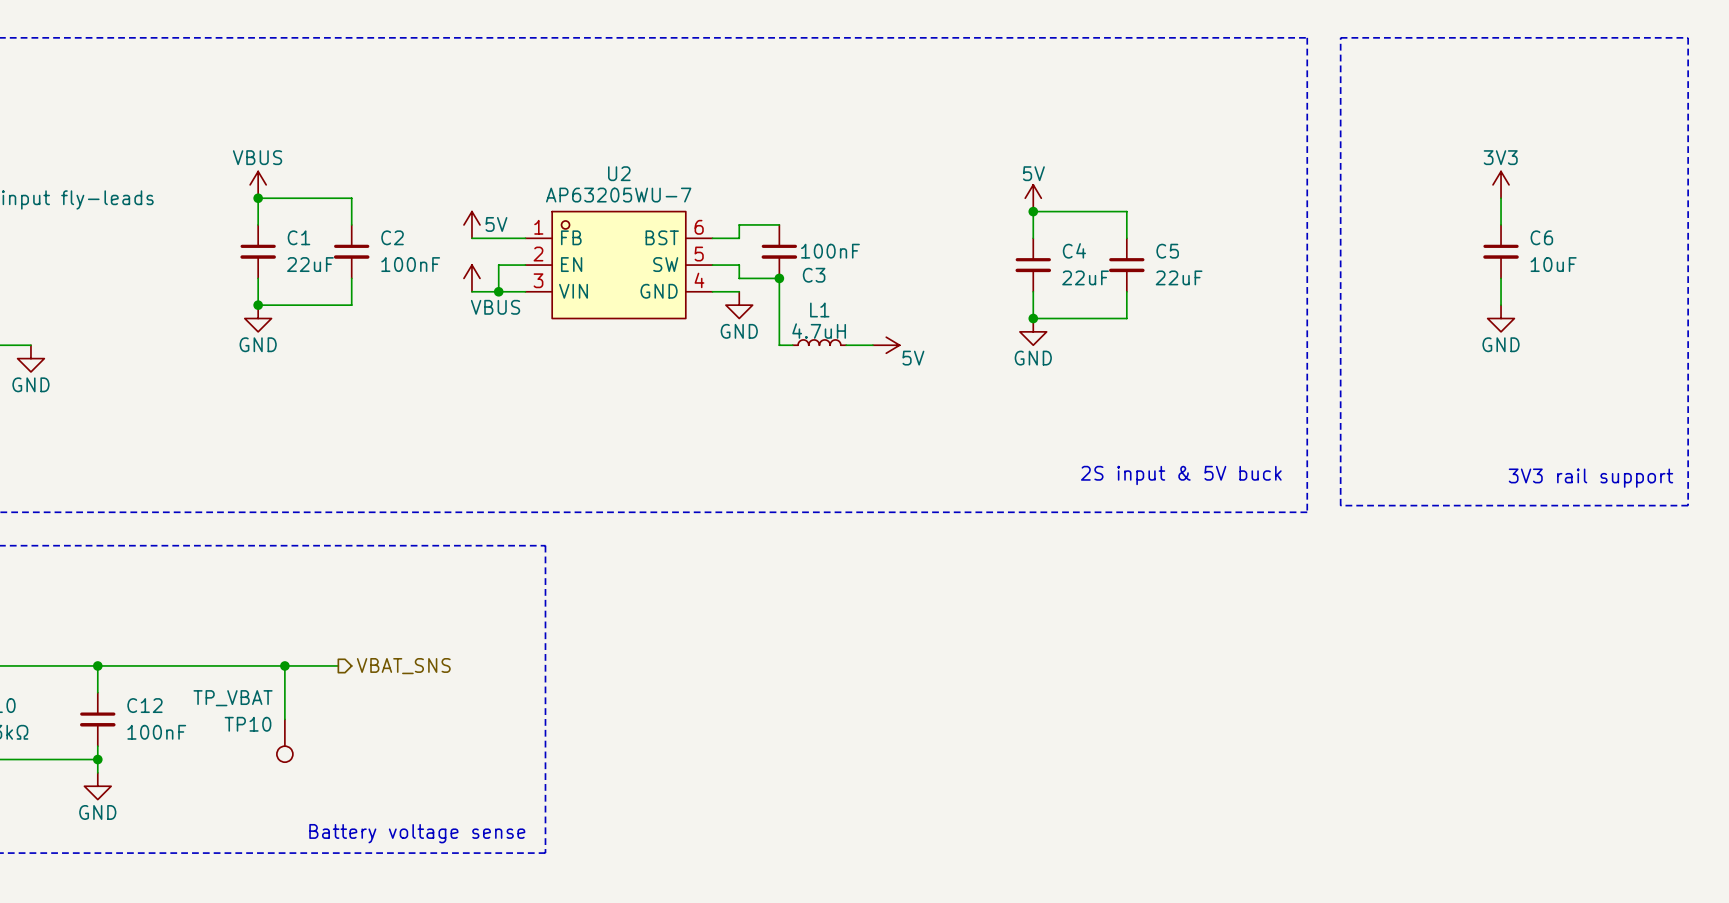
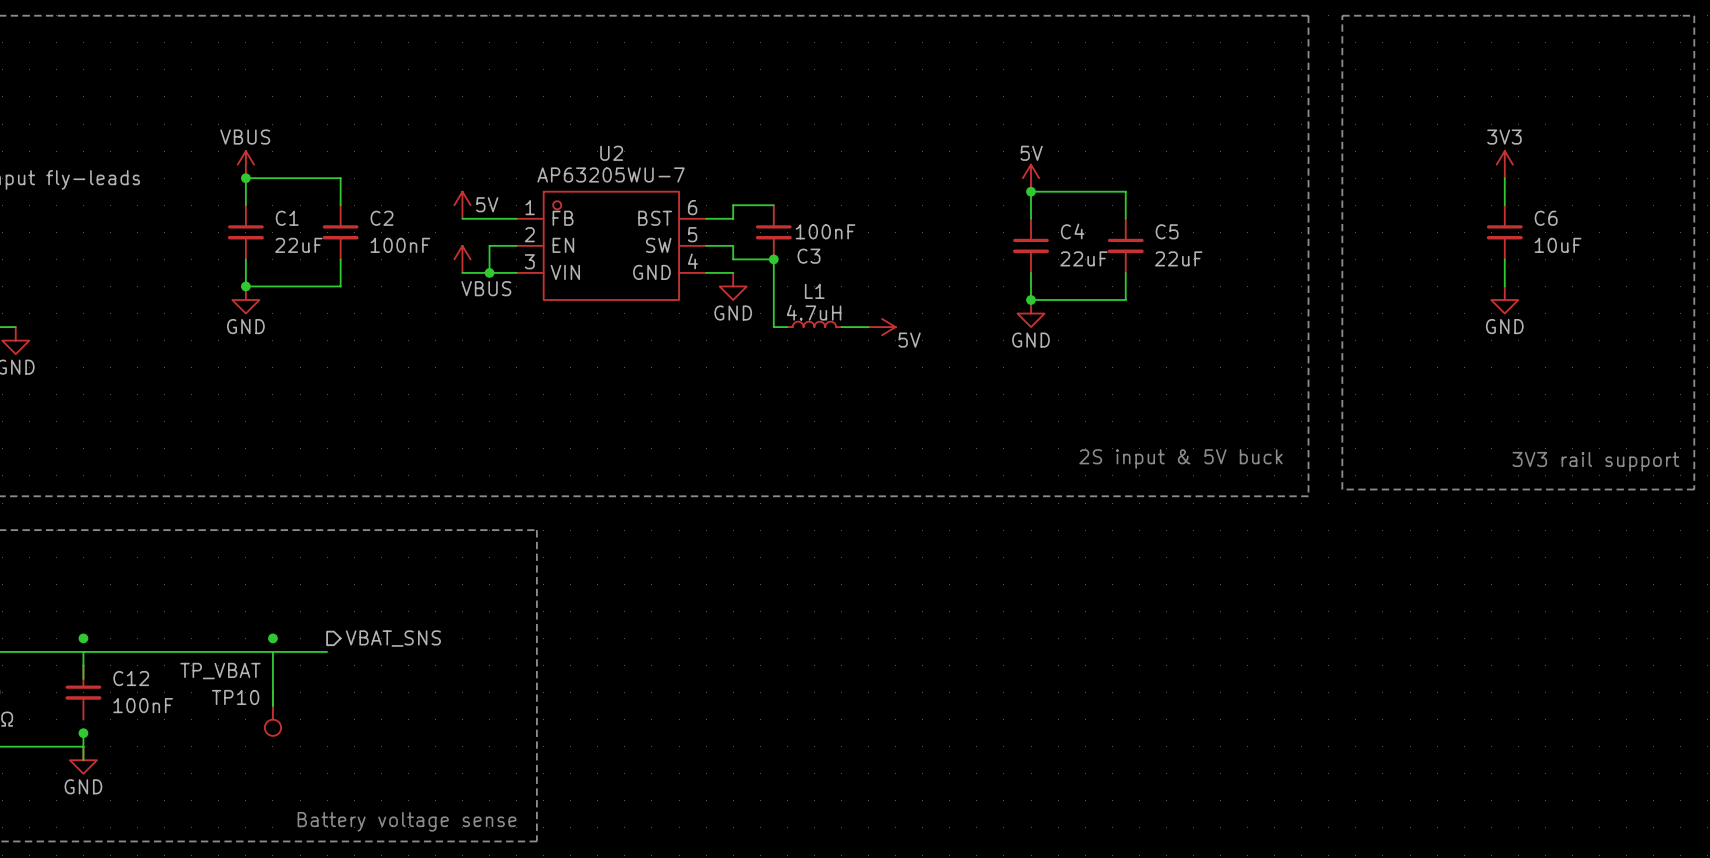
junction position: (97, 665) -> (83, 638)
junction position: (284, 665) -> (272, 638)
hierarchical label position: VBAT_SNS (403, 666) -> VBAT_SNS (393, 638)
C12 position: (97, 719) -> (83, 692)
TP10 position: (284, 740) -> (272, 714)
junction position: (97, 759) -> (83, 733)
power symbol position: GND (97, 786) -> GND (83, 760)

